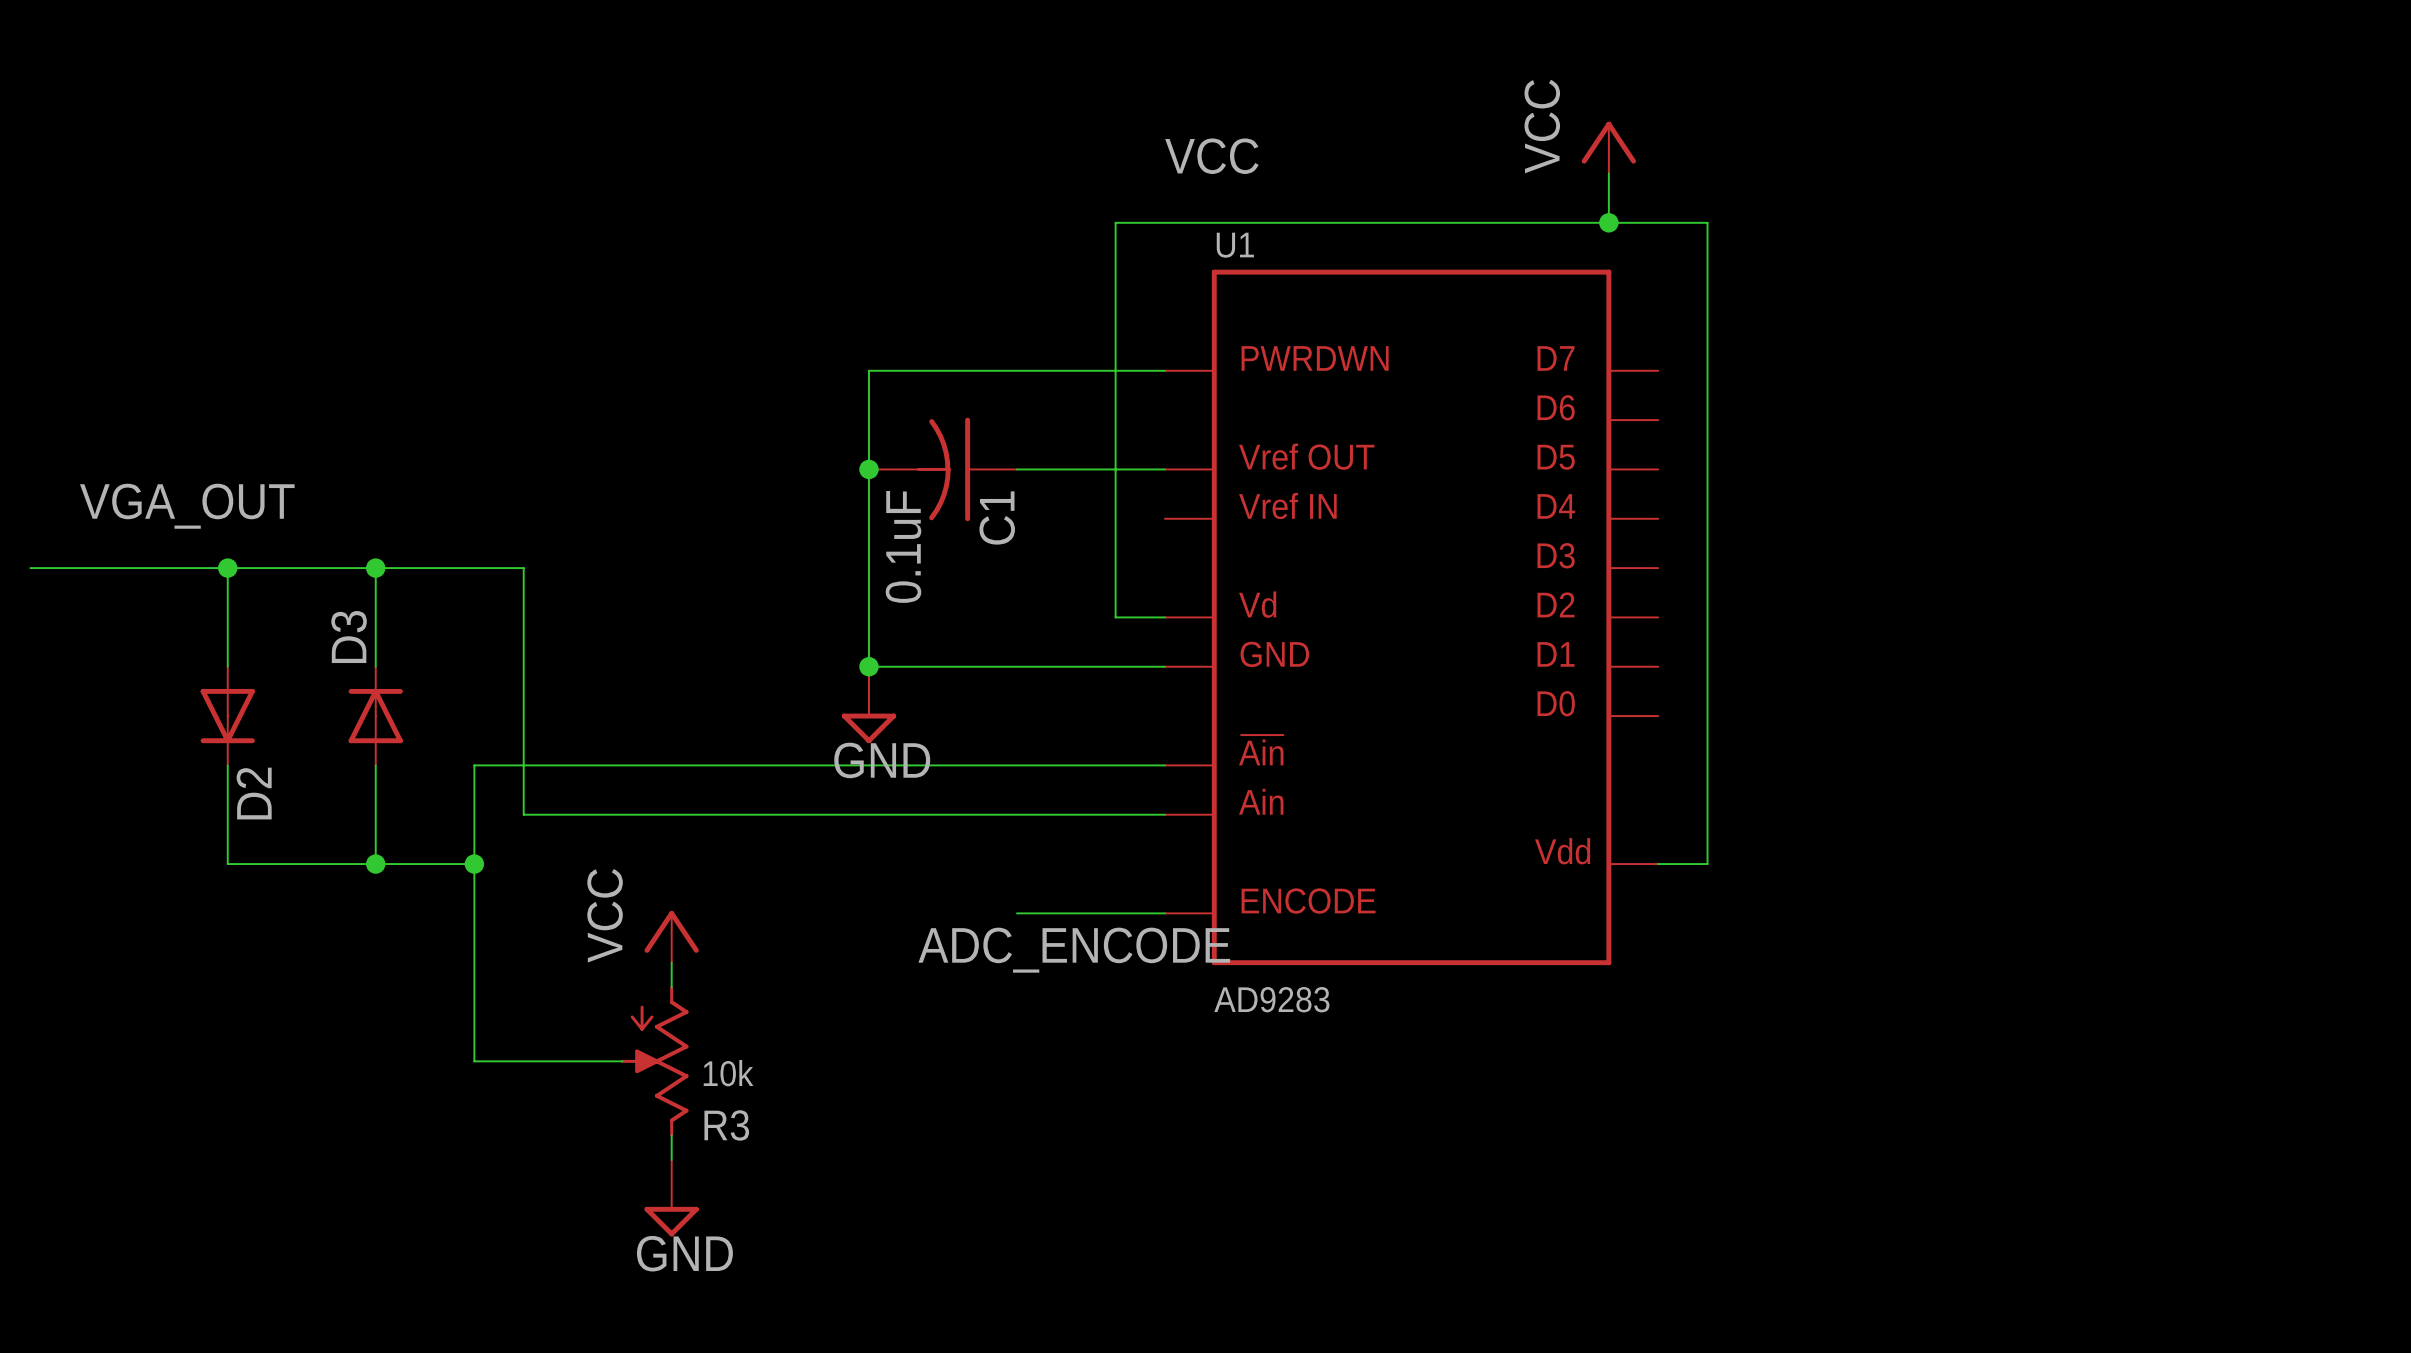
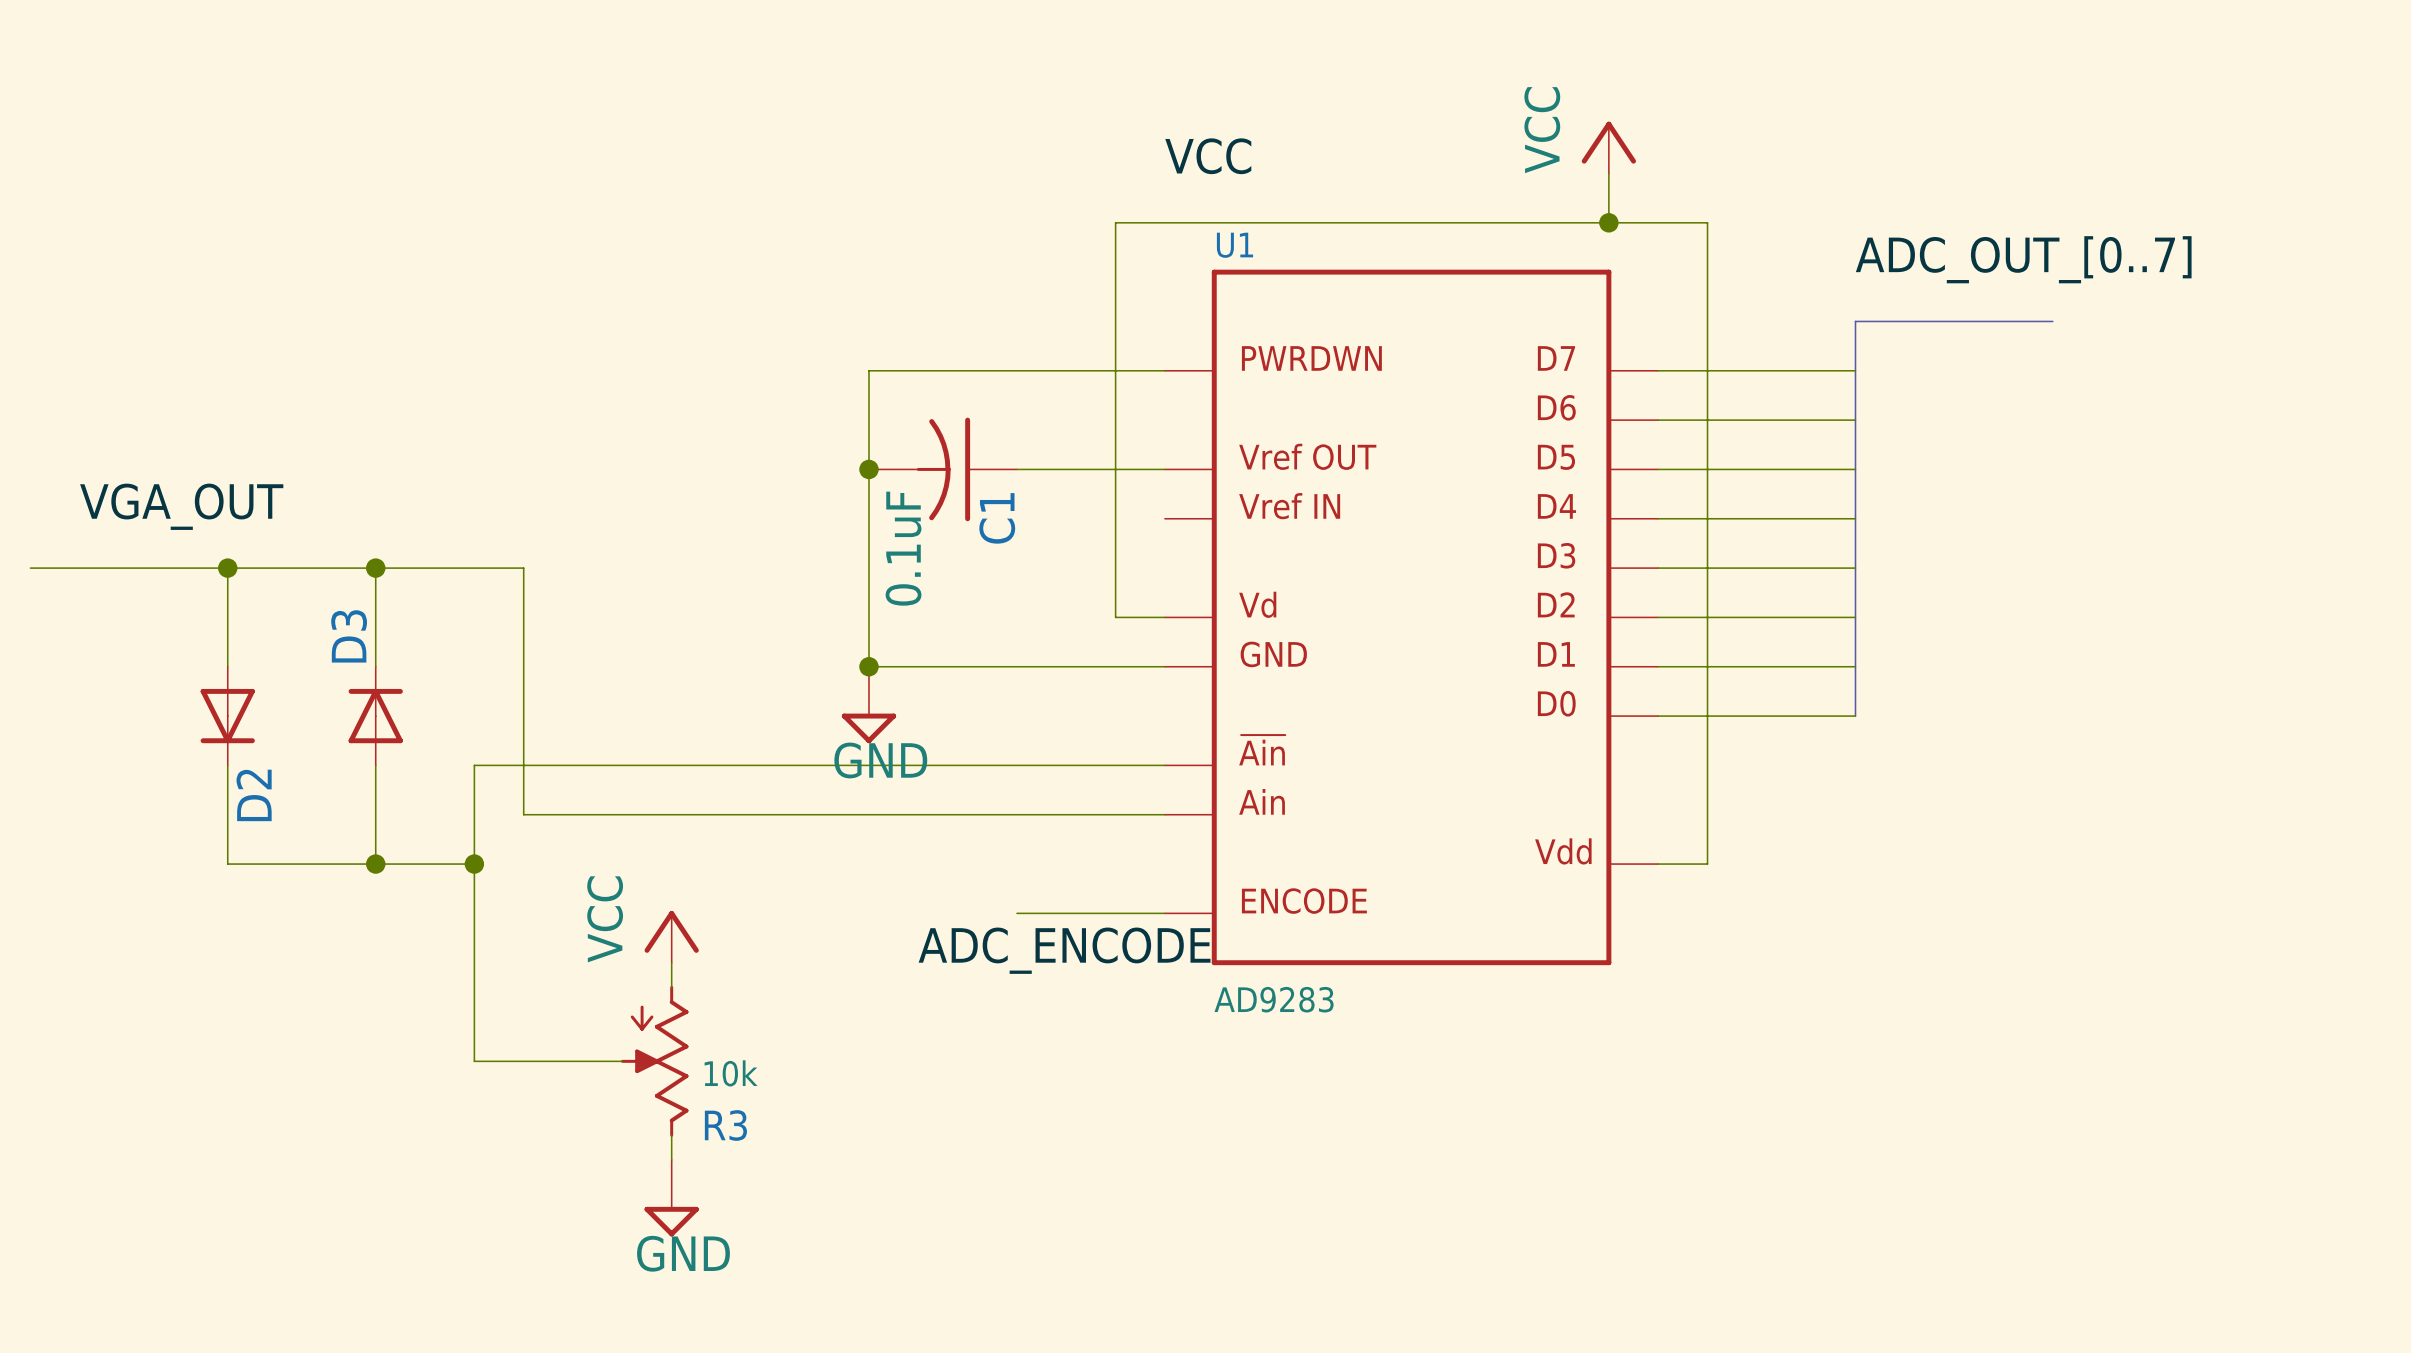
label: none -> ADC_OUT_[0..7] (2023, 259)
bus: none -> (2052, 321) (1855, 321) (1855, 716)
wire: none -> (1658, 370) (1855, 370)
wire: none -> (1658, 420) (1855, 420)
wire: none -> (1658, 469) (1855, 469)
wire: none -> (1658, 518) (1855, 518)
wire: none -> (1658, 568) (1855, 568)
wire: none -> (1658, 617) (1855, 617)
wire: none -> (1658, 666) (1855, 666)
wire: none -> (1658, 716) (1855, 716)

